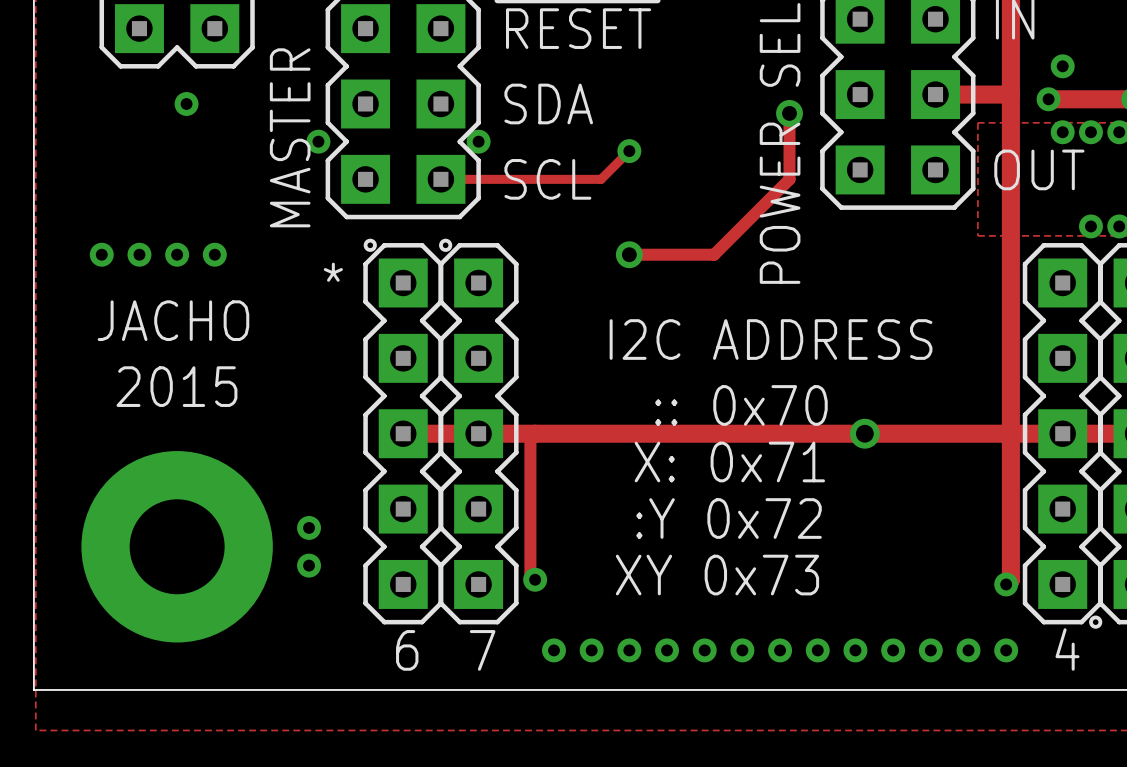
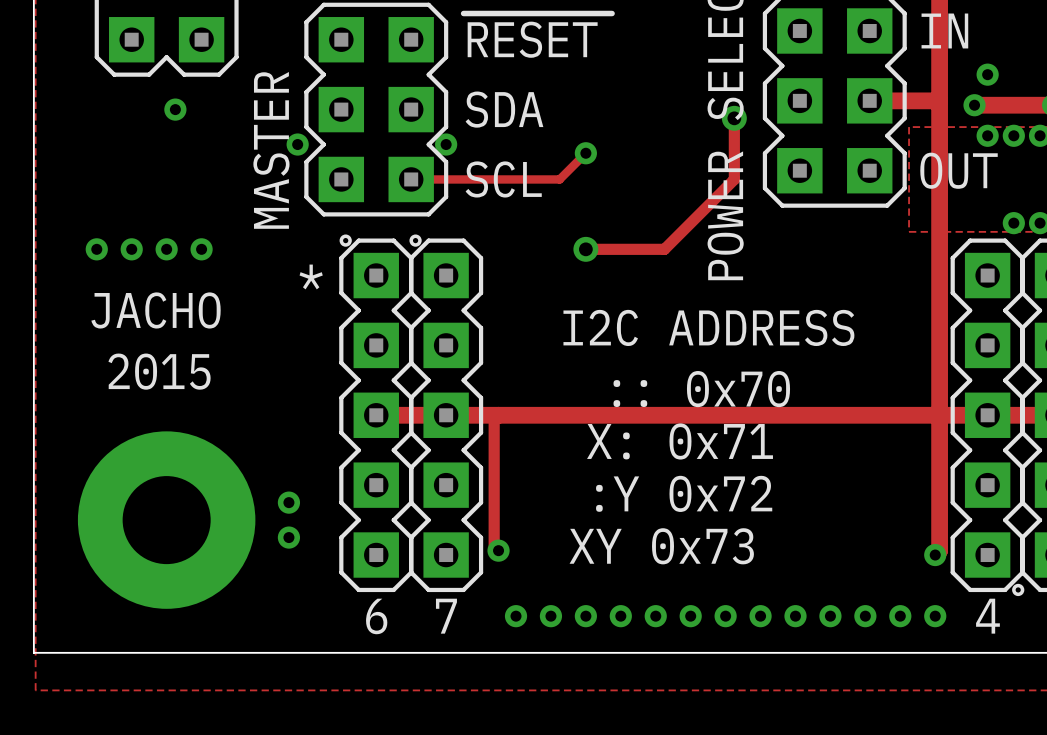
via: (864, 433) -> none

